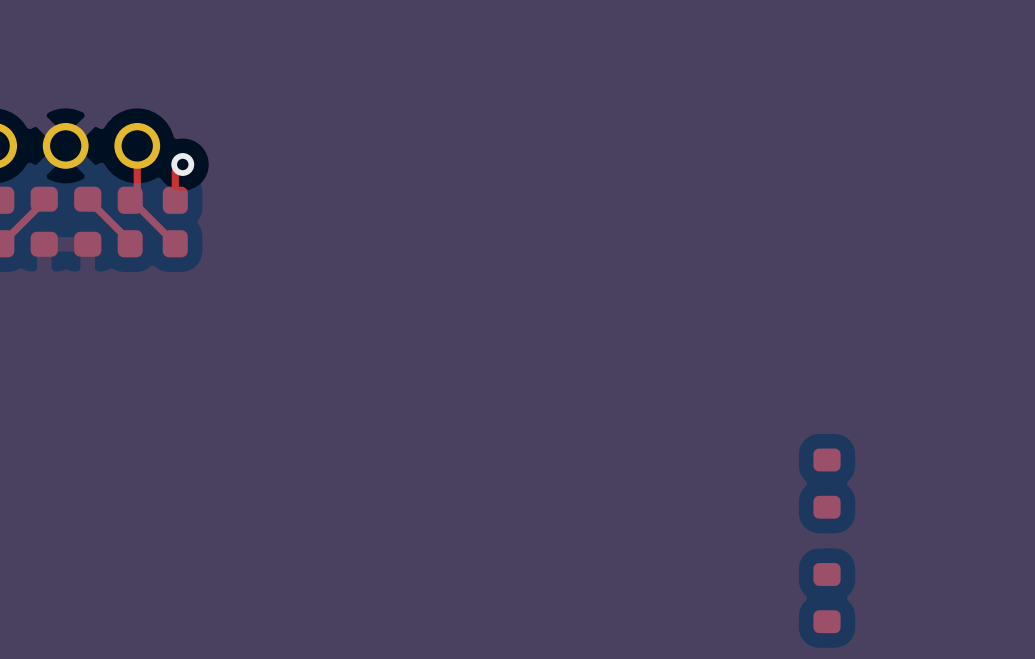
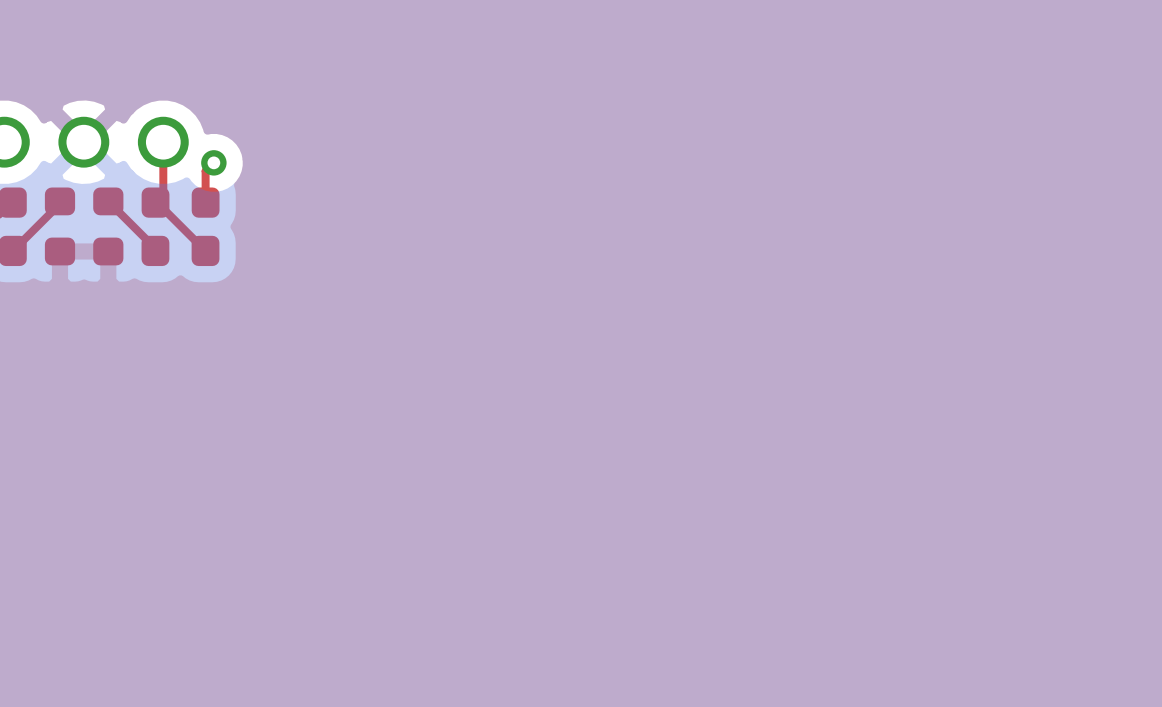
part: (827, 483) -> none
part: (827, 598) -> none

